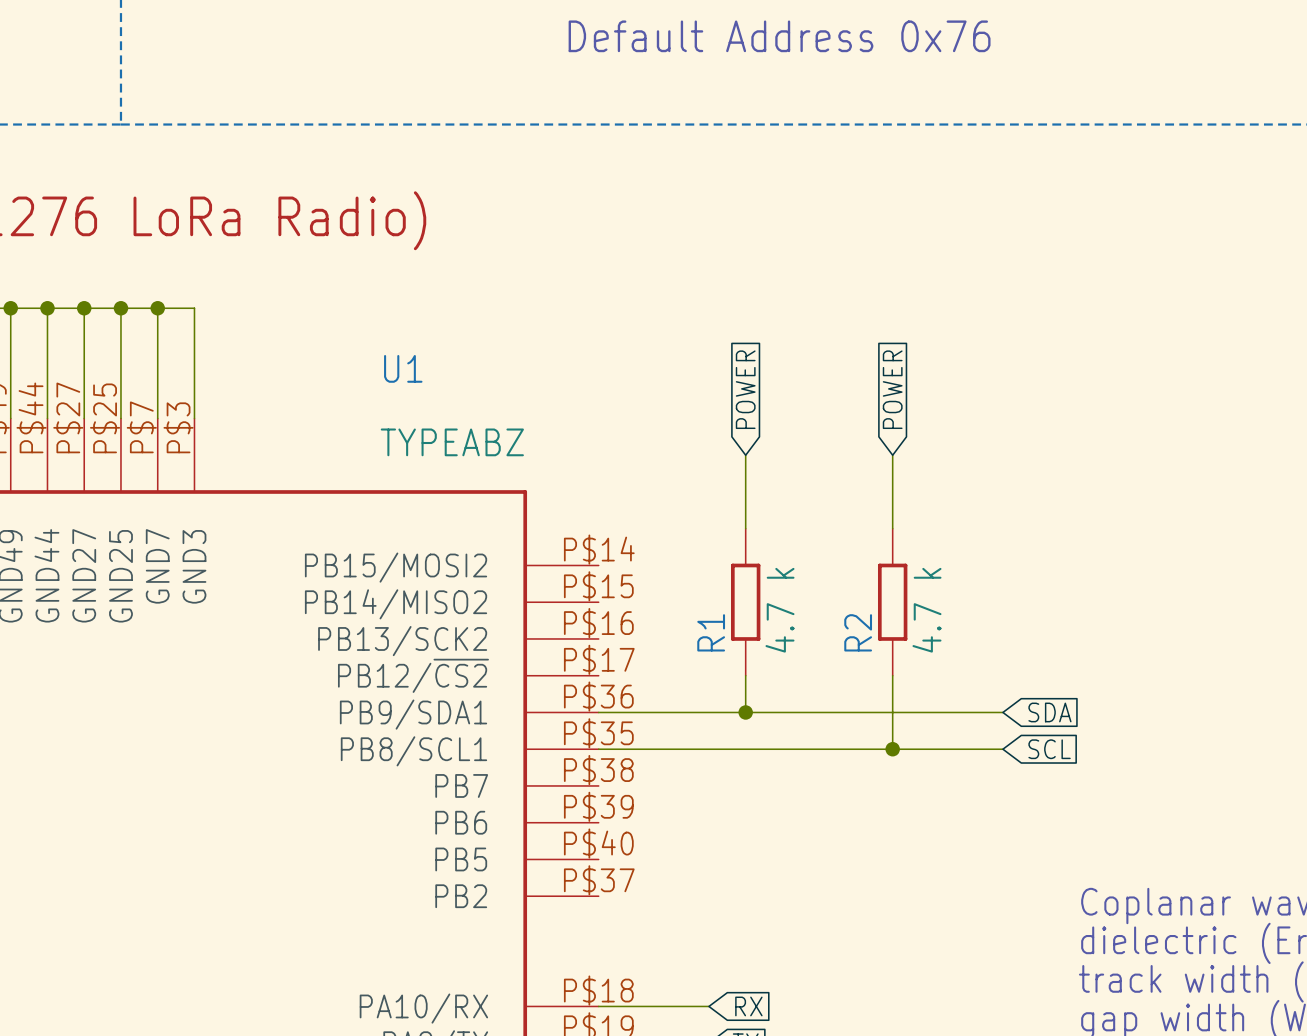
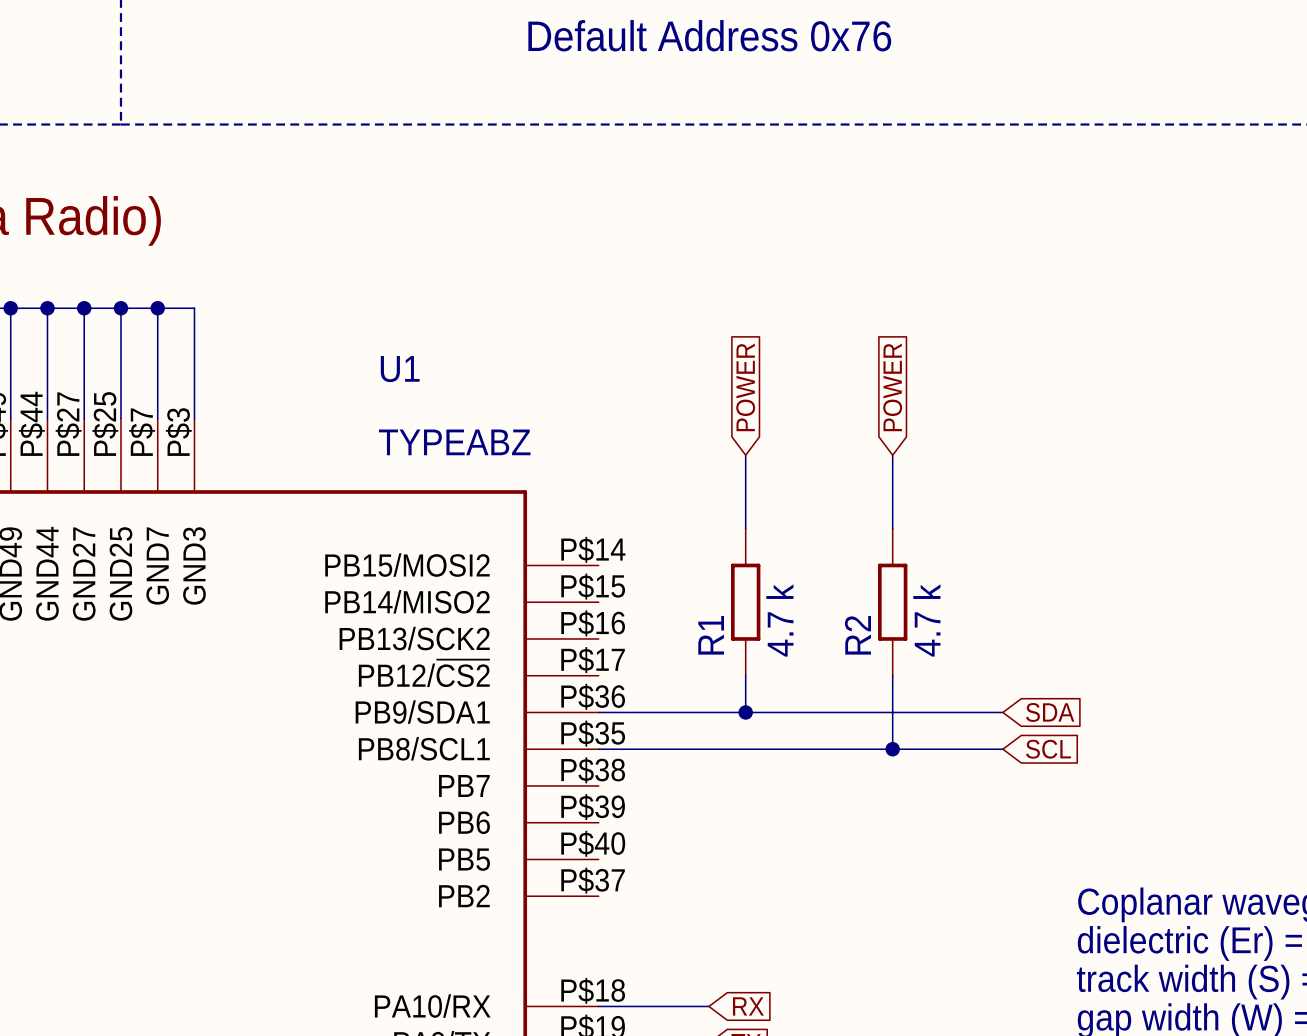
text position: Default Address 0x76 (779, 36) -> Default Address 0x76 (709, 35)

